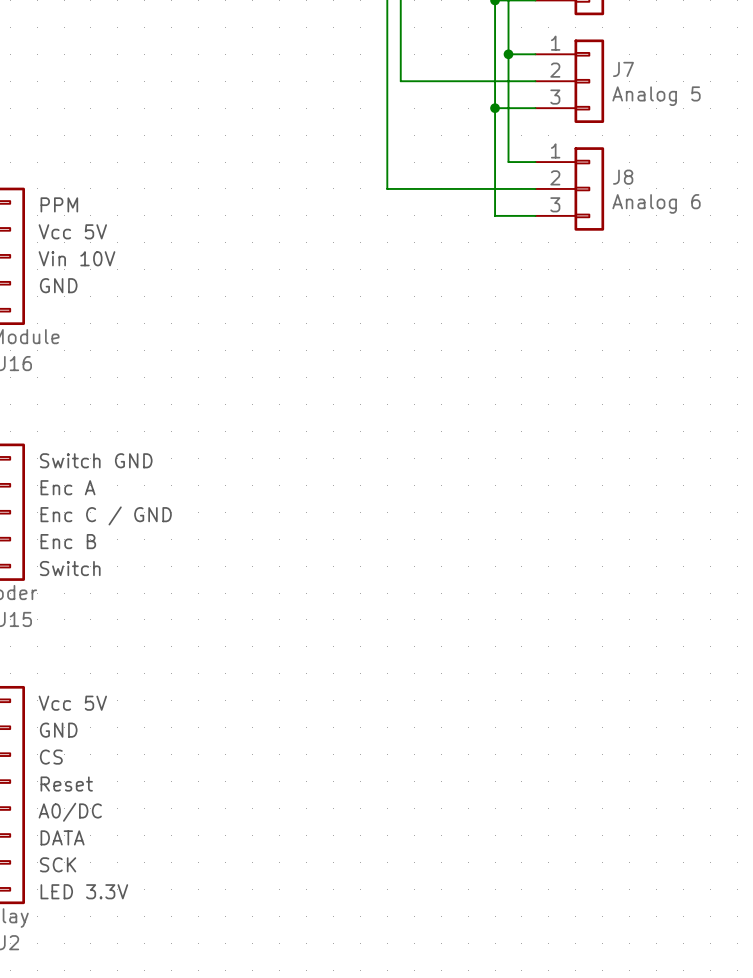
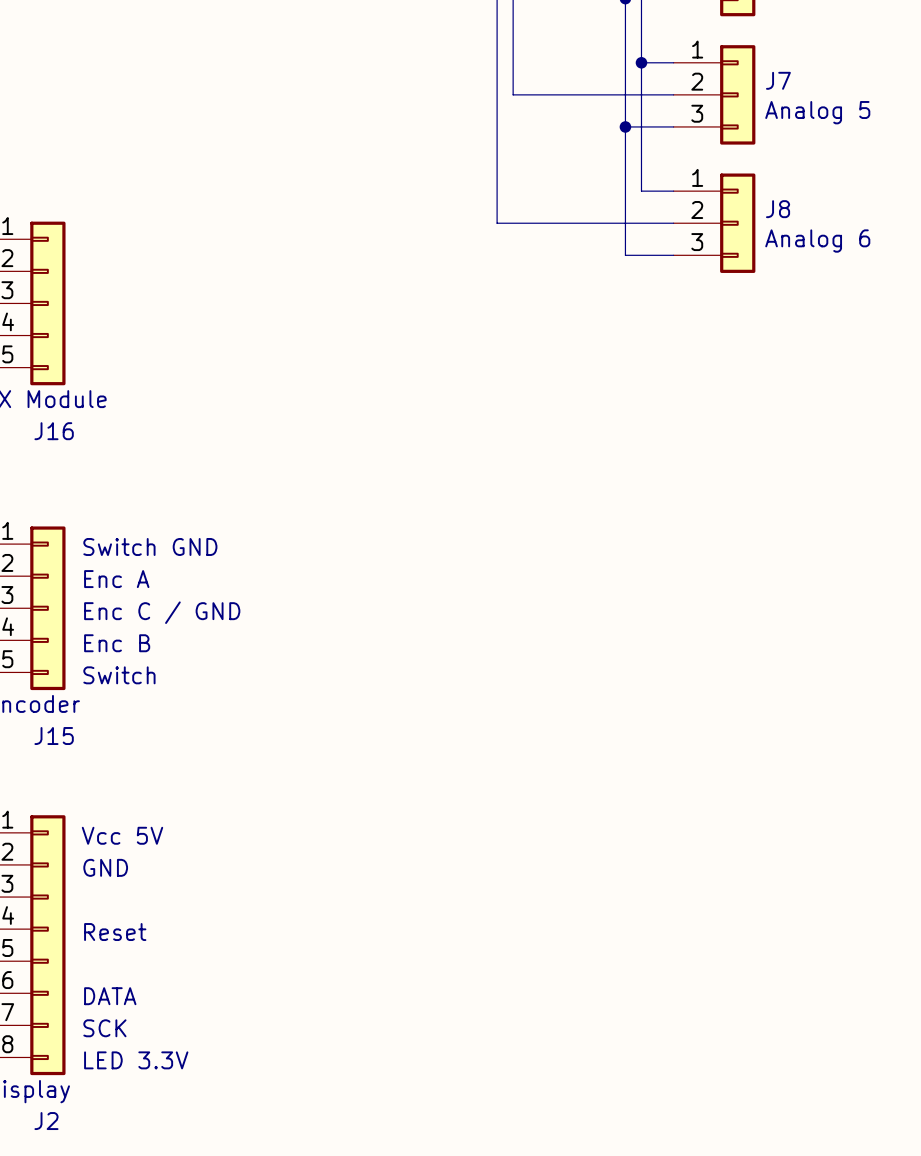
text: PPM (59, 204) -> none
text: Vcc 5V (72, 231) -> none
text: Vin 10V (76, 258) -> none
text: GND (58, 285) -> none
text: CS (51, 757) -> none
text: A0/DC (70, 812) -> none

